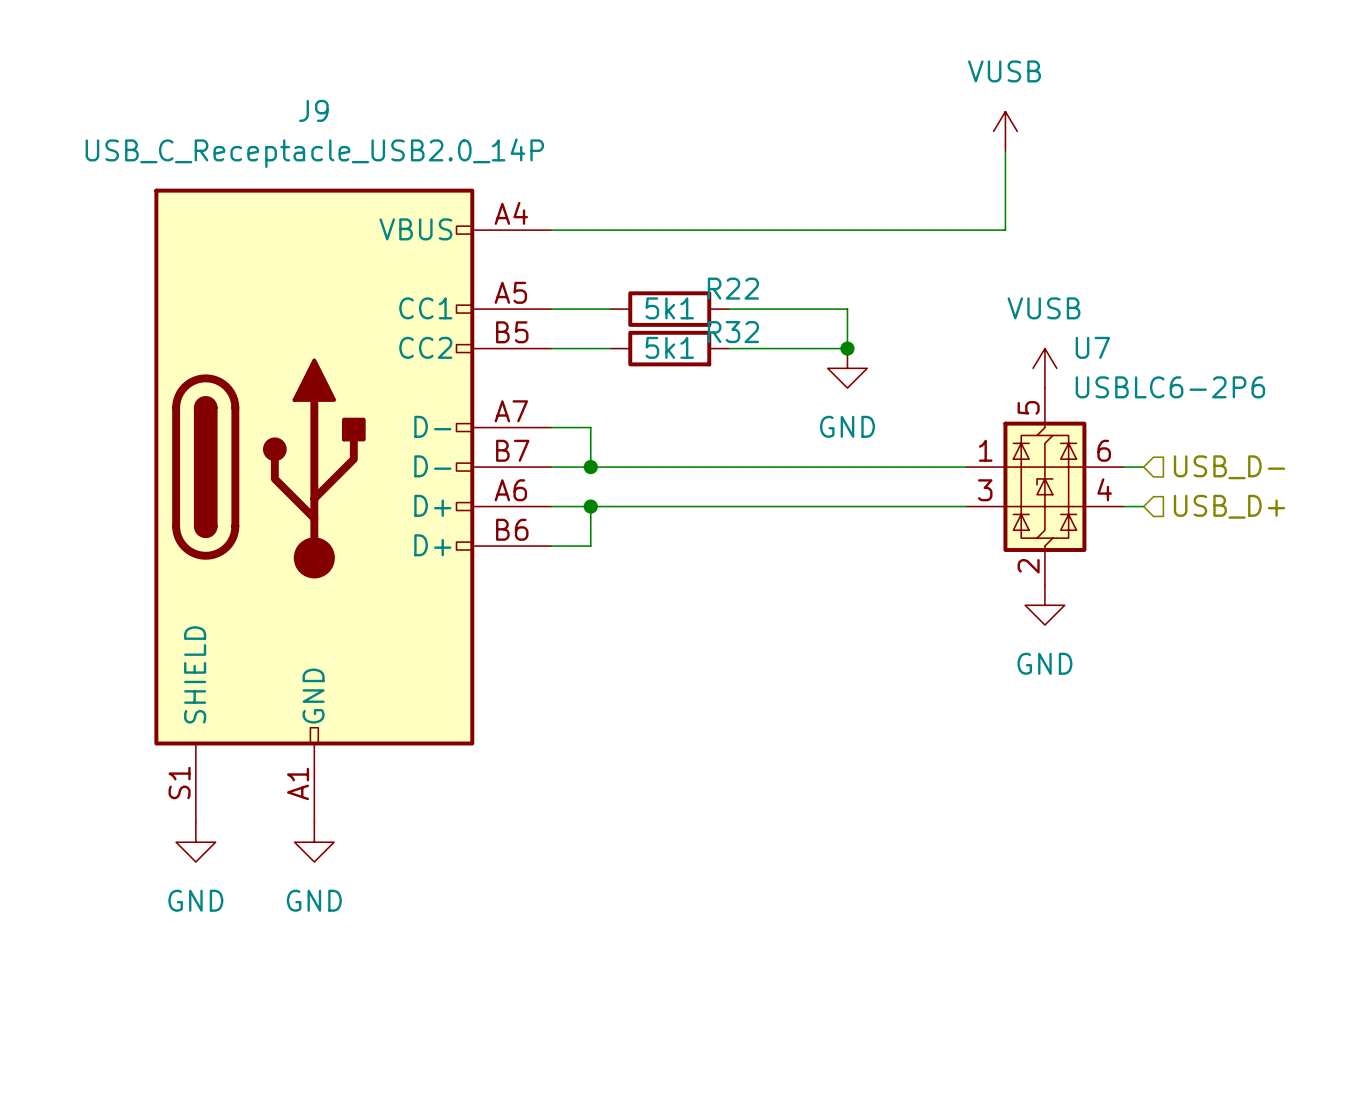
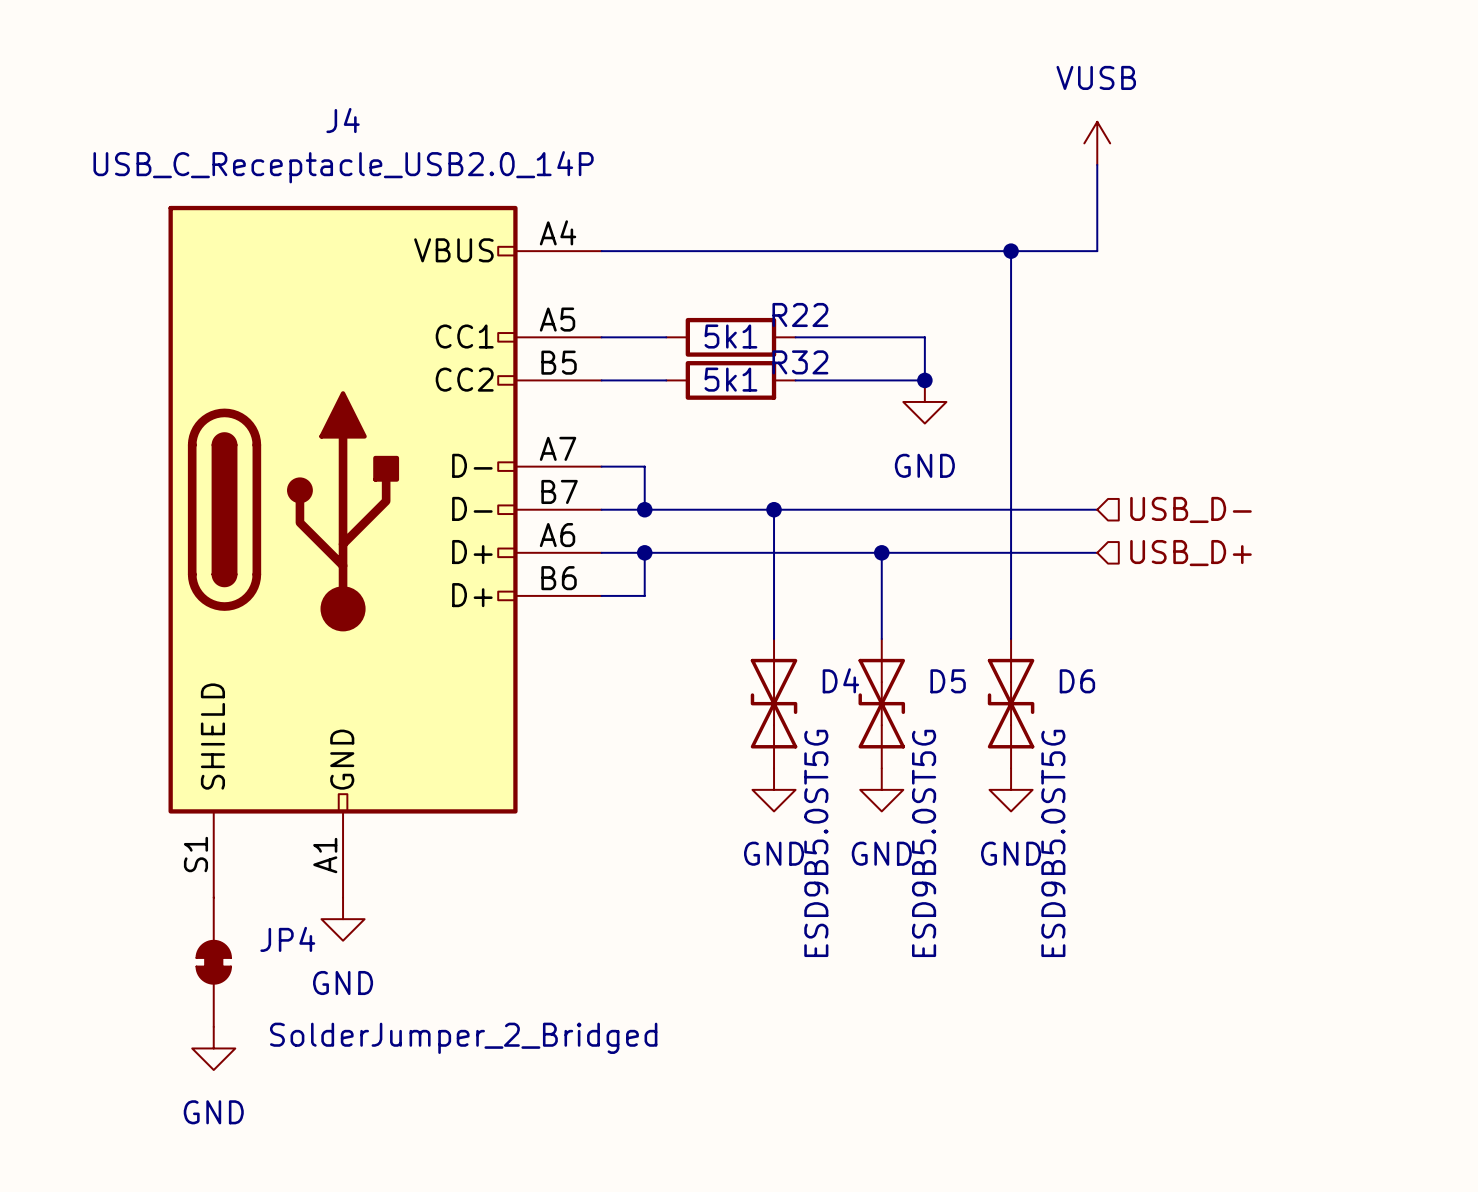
J9 name: J9 (313, 110) -> J4 (343, 120)
wire: none -> (1011, 251) (1011, 639)
junction: none -> (1011, 251)
power symbol: VUSB (1044, 368) -> none
wire: none -> (774, 509) (774, 639)
junction: none -> (774, 509)
wire: (1123, 467) (1143, 467) -> none
hierarchical label position: USB_D- (1229, 467) -> USB_D- (1190, 509)
U7: USBLC6-2P6 (1044, 486) -> none
wire: none -> (881, 552) (881, 639)
junction: none -> (881, 552)
wire: (1123, 506) (1143, 506) -> none
hierarchical label position: USB_D+ (1229, 506) -> USB_D+ (1190, 553)
power symbol: GND (1044, 605) -> none
D4: none -> ESD9B5.0ST5G (774, 703)
D5: none -> ESD9B5.0ST5G (881, 703)
D6: none -> ESD9B5.0ST5G (1011, 703)
power symbol: none -> GND (774, 789)
power symbol: none -> GND (881, 789)
power symbol: none -> GND (1011, 789)
power symbol position: GND (195, 842) -> GND (213, 1048)
JP4: none -> SolderJumper_2_Bridged (213, 962)

